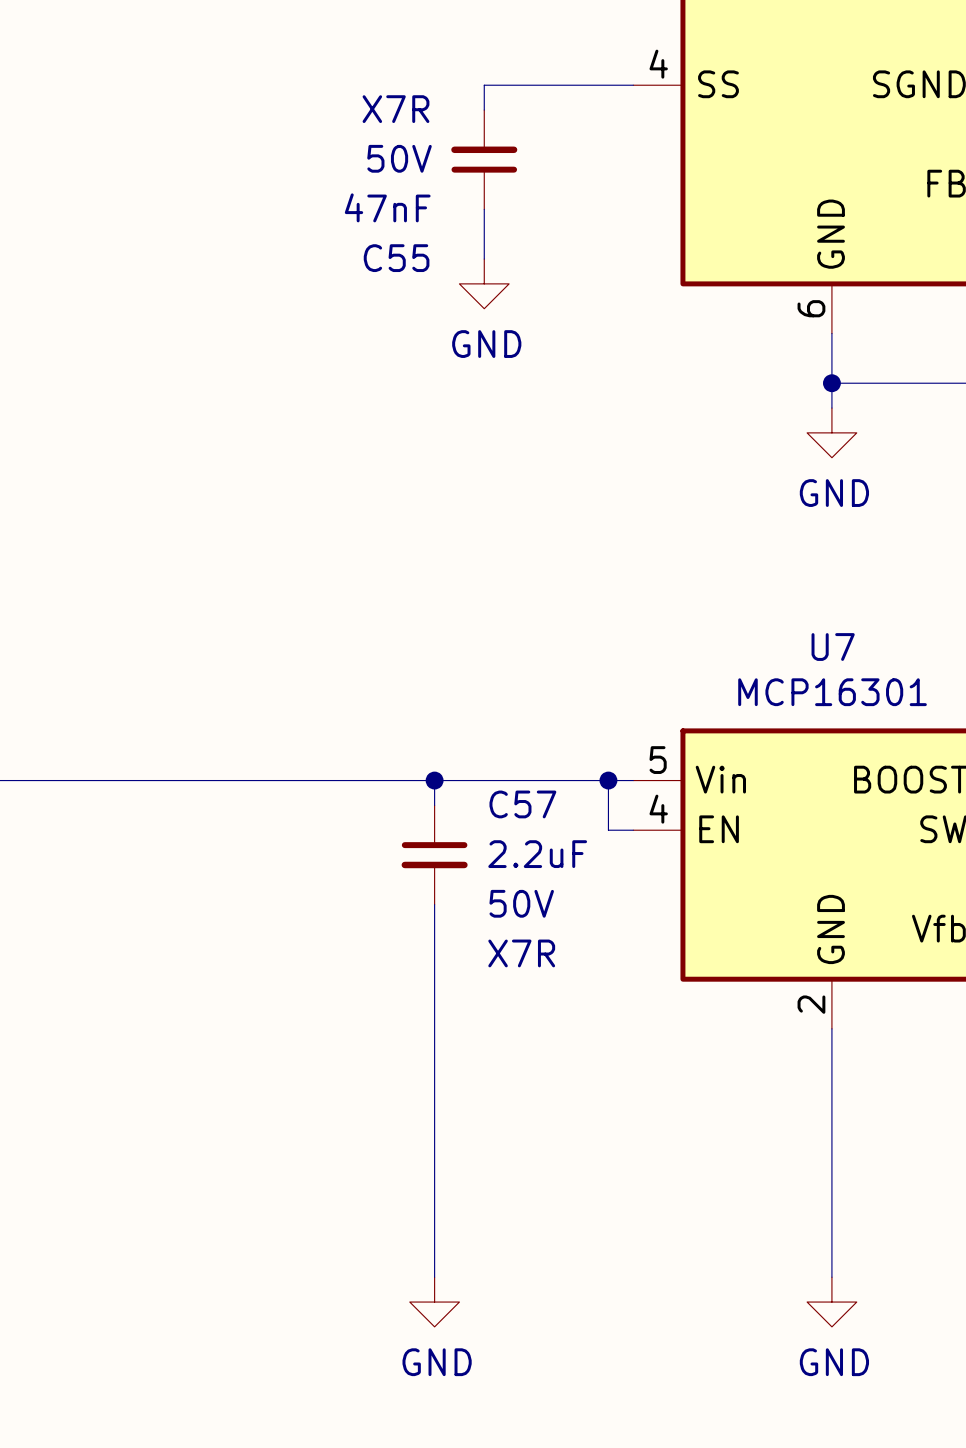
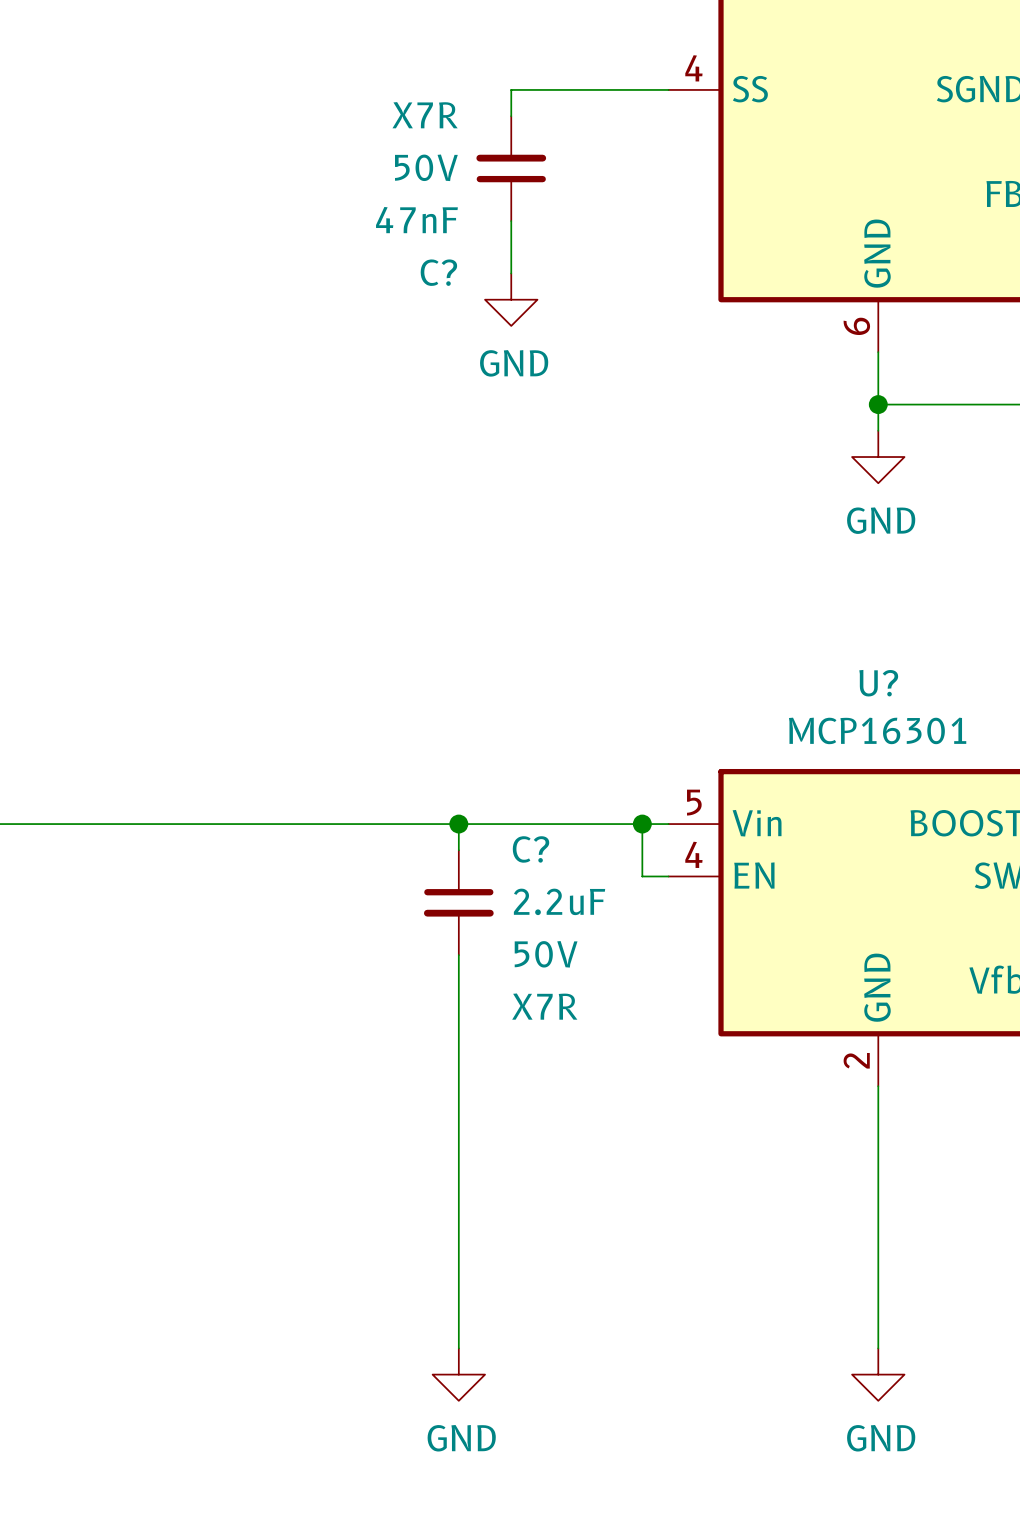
C55 name: C55 (396, 258) -> C? (438, 272)
U7 name: U7 (833, 647) -> U? (878, 683)
C57 name: C57 (522, 804) -> C? (531, 849)

